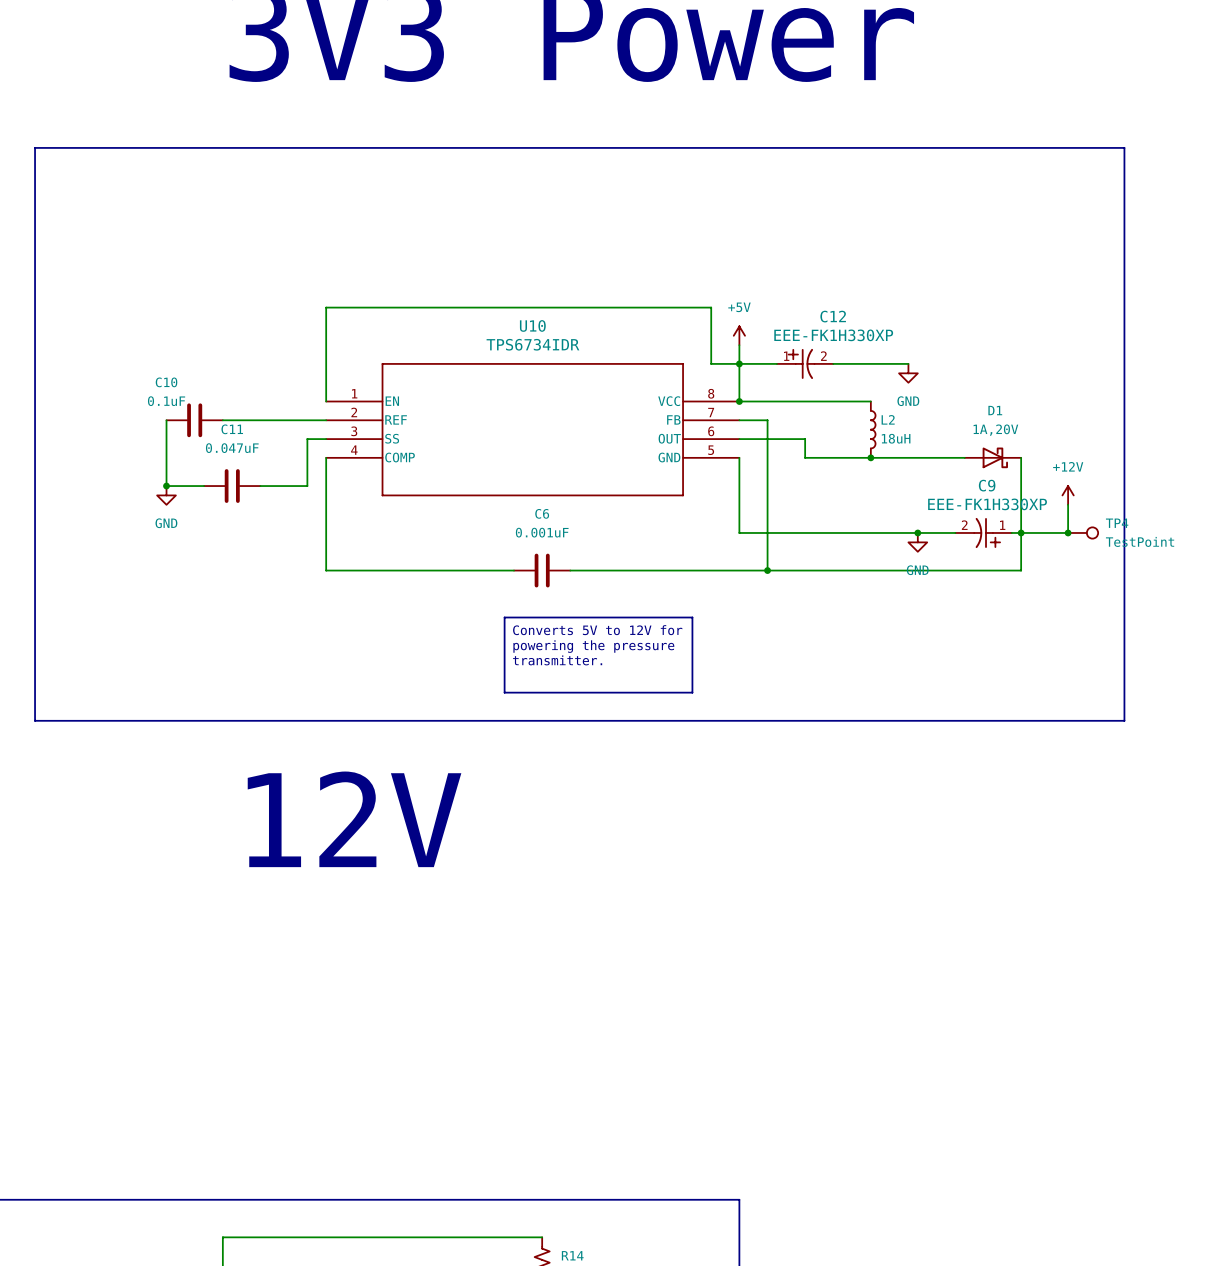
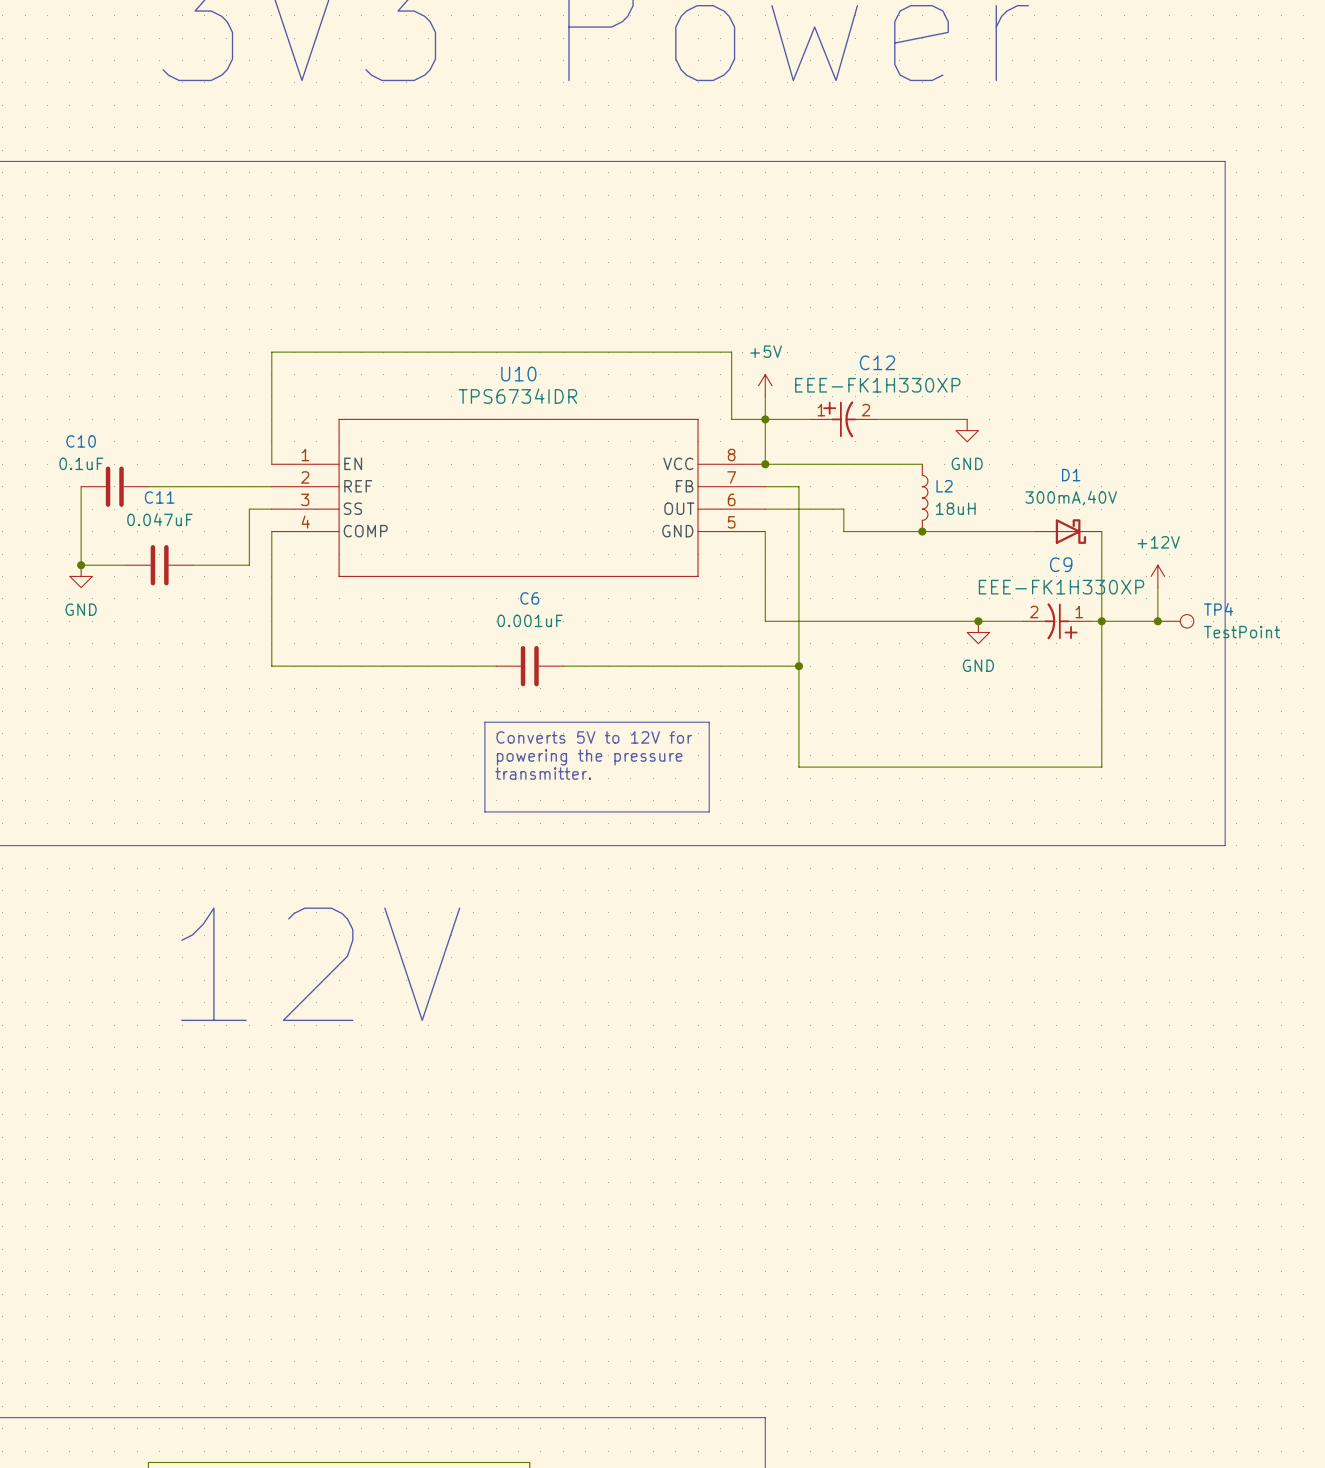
D1 value: 1A,20V (995, 430) -> 300mA,40V (1071, 498)
wire: (767, 570) (1021, 570) -> (798, 666) (798, 767) (1101, 767) (1101, 666)

